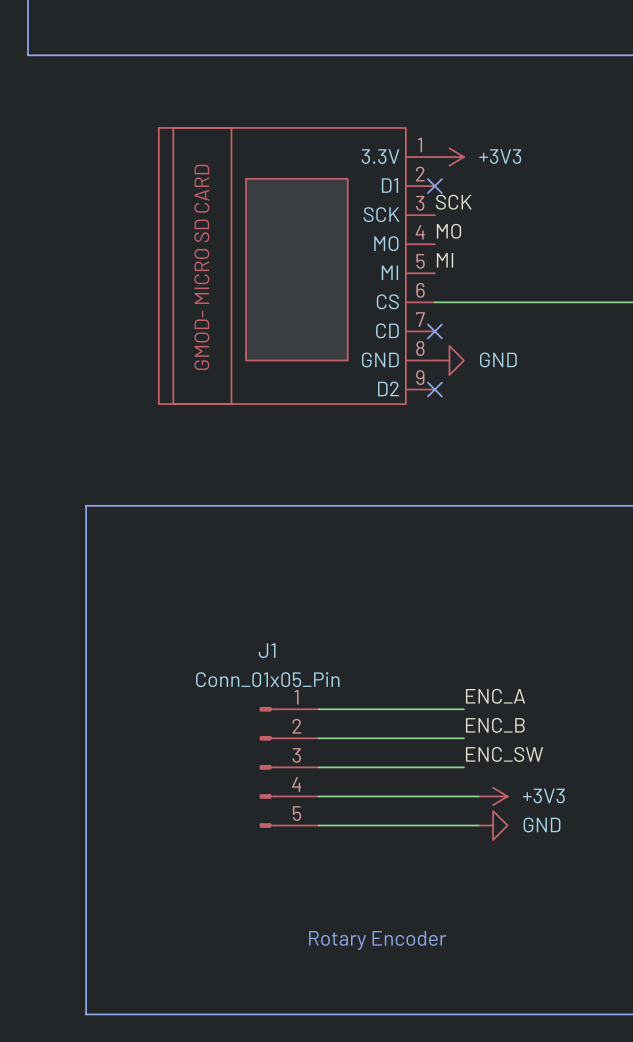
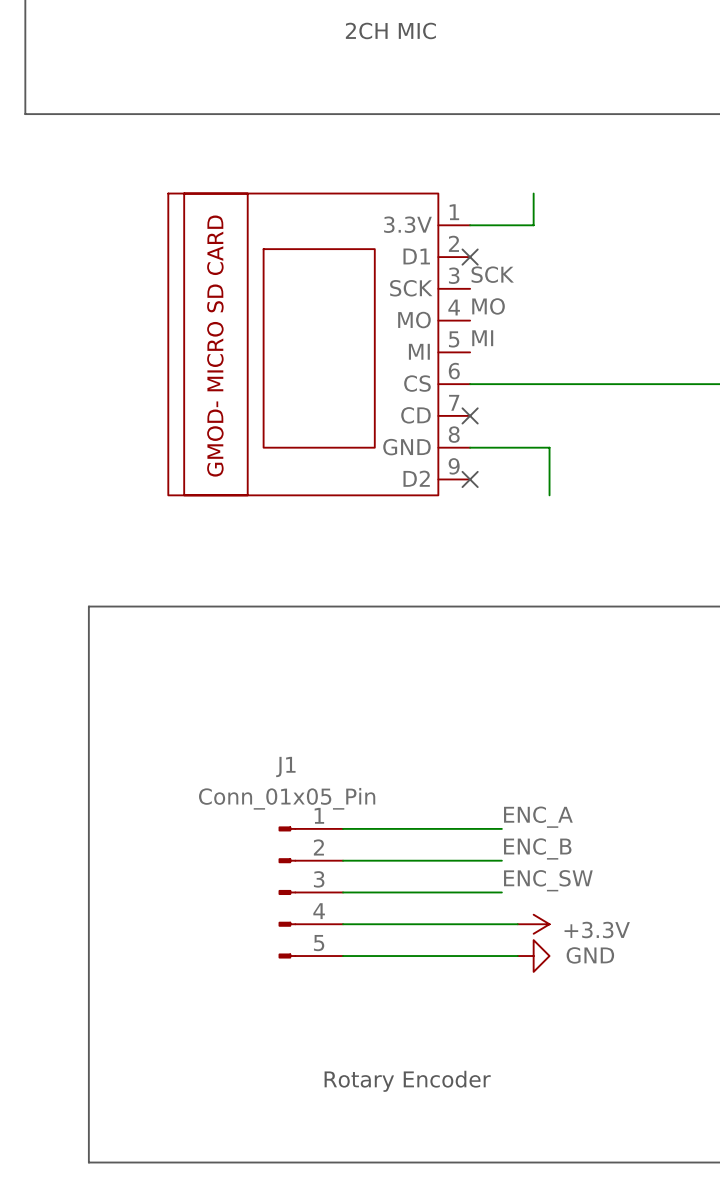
wire: none -> (533, 193) (533, 225) (470, 225)
power symbol: +3V3 (449, 157) -> none
wire: none -> (470, 447) (549, 447) (549, 495)
power symbol: GND (449, 360) -> none
power symbol: +3V3 (493, 796) -> +3.3V (533, 924)

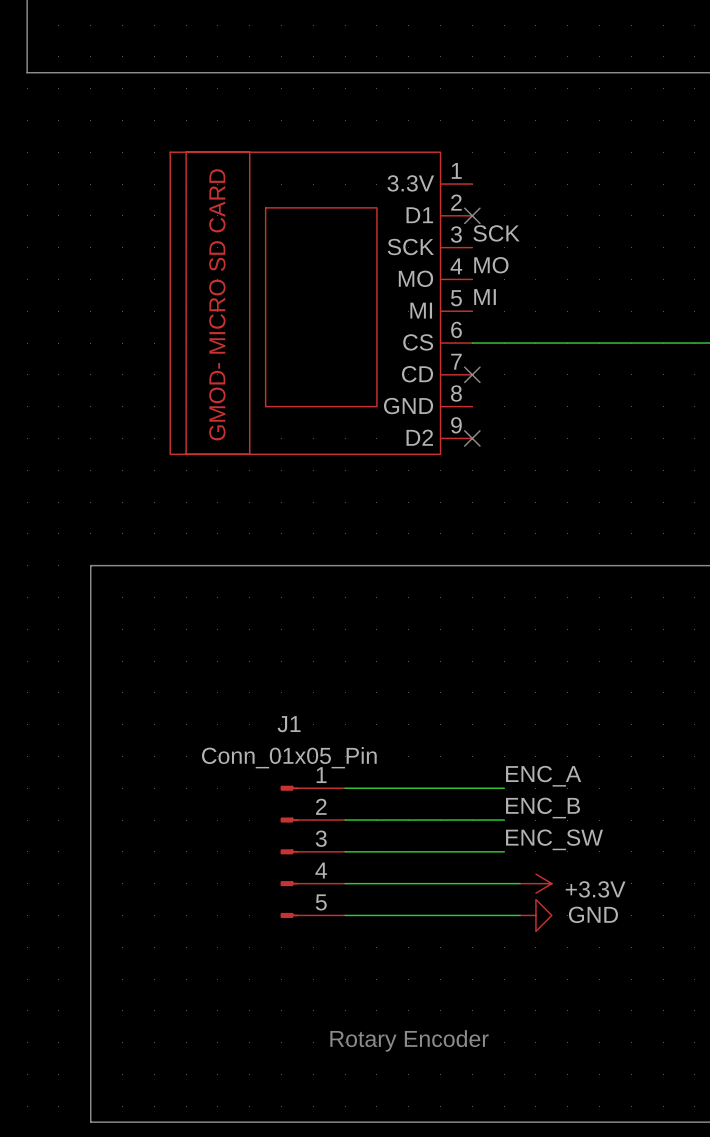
wire: (533, 193) (533, 225) (470, 225) -> none
wire: (470, 447) (549, 447) (549, 495) -> none

